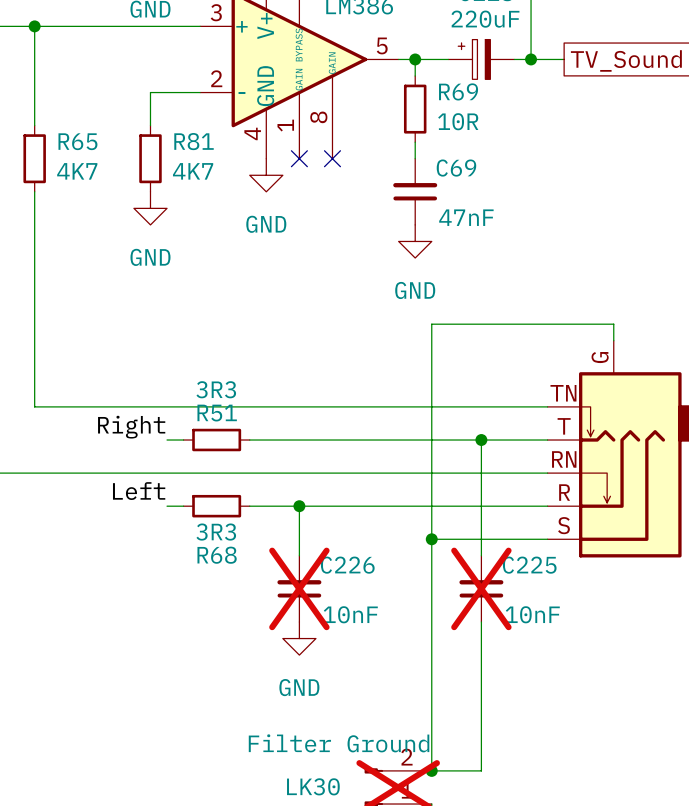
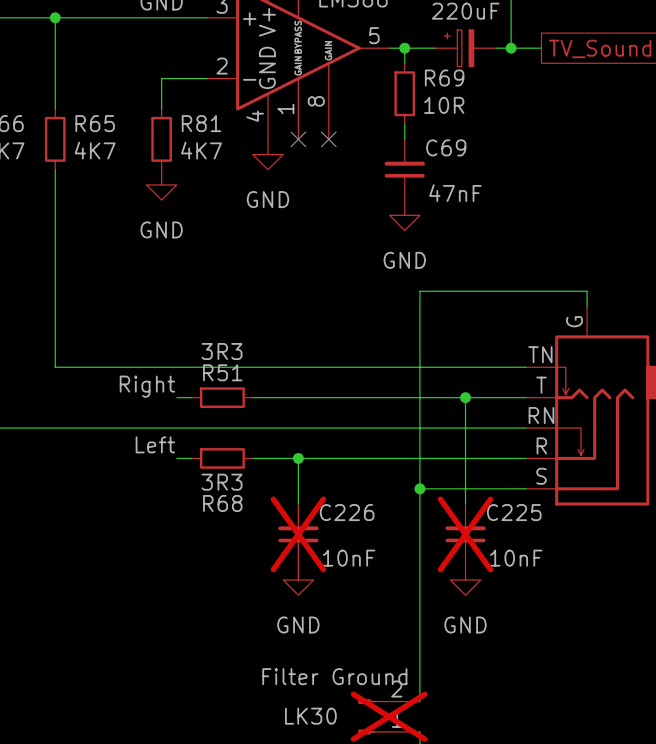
wire: (481, 622) (481, 770) (431, 770) -> none
power symbol: none -> GND (465, 579)
junction: (431, 770) -> none

